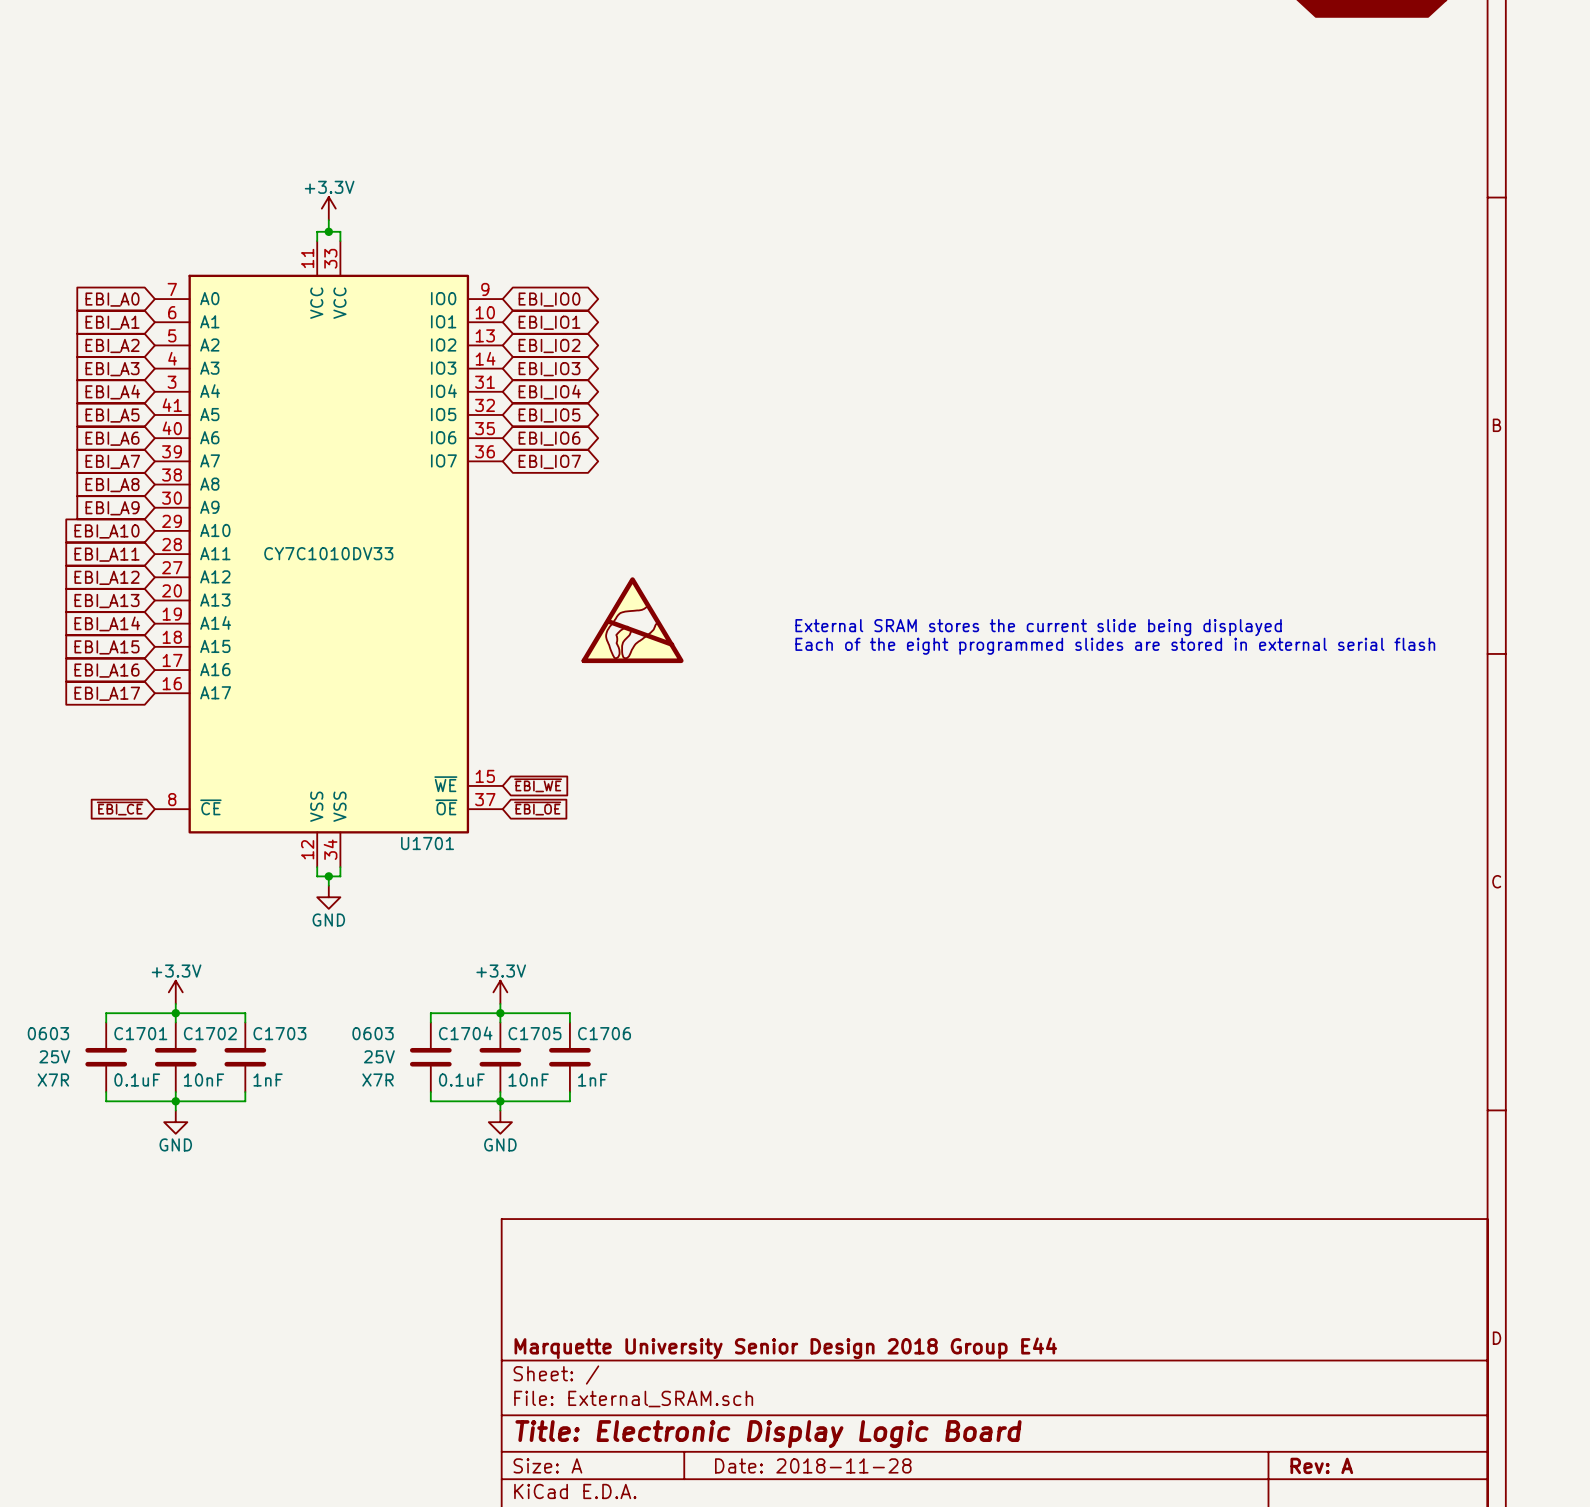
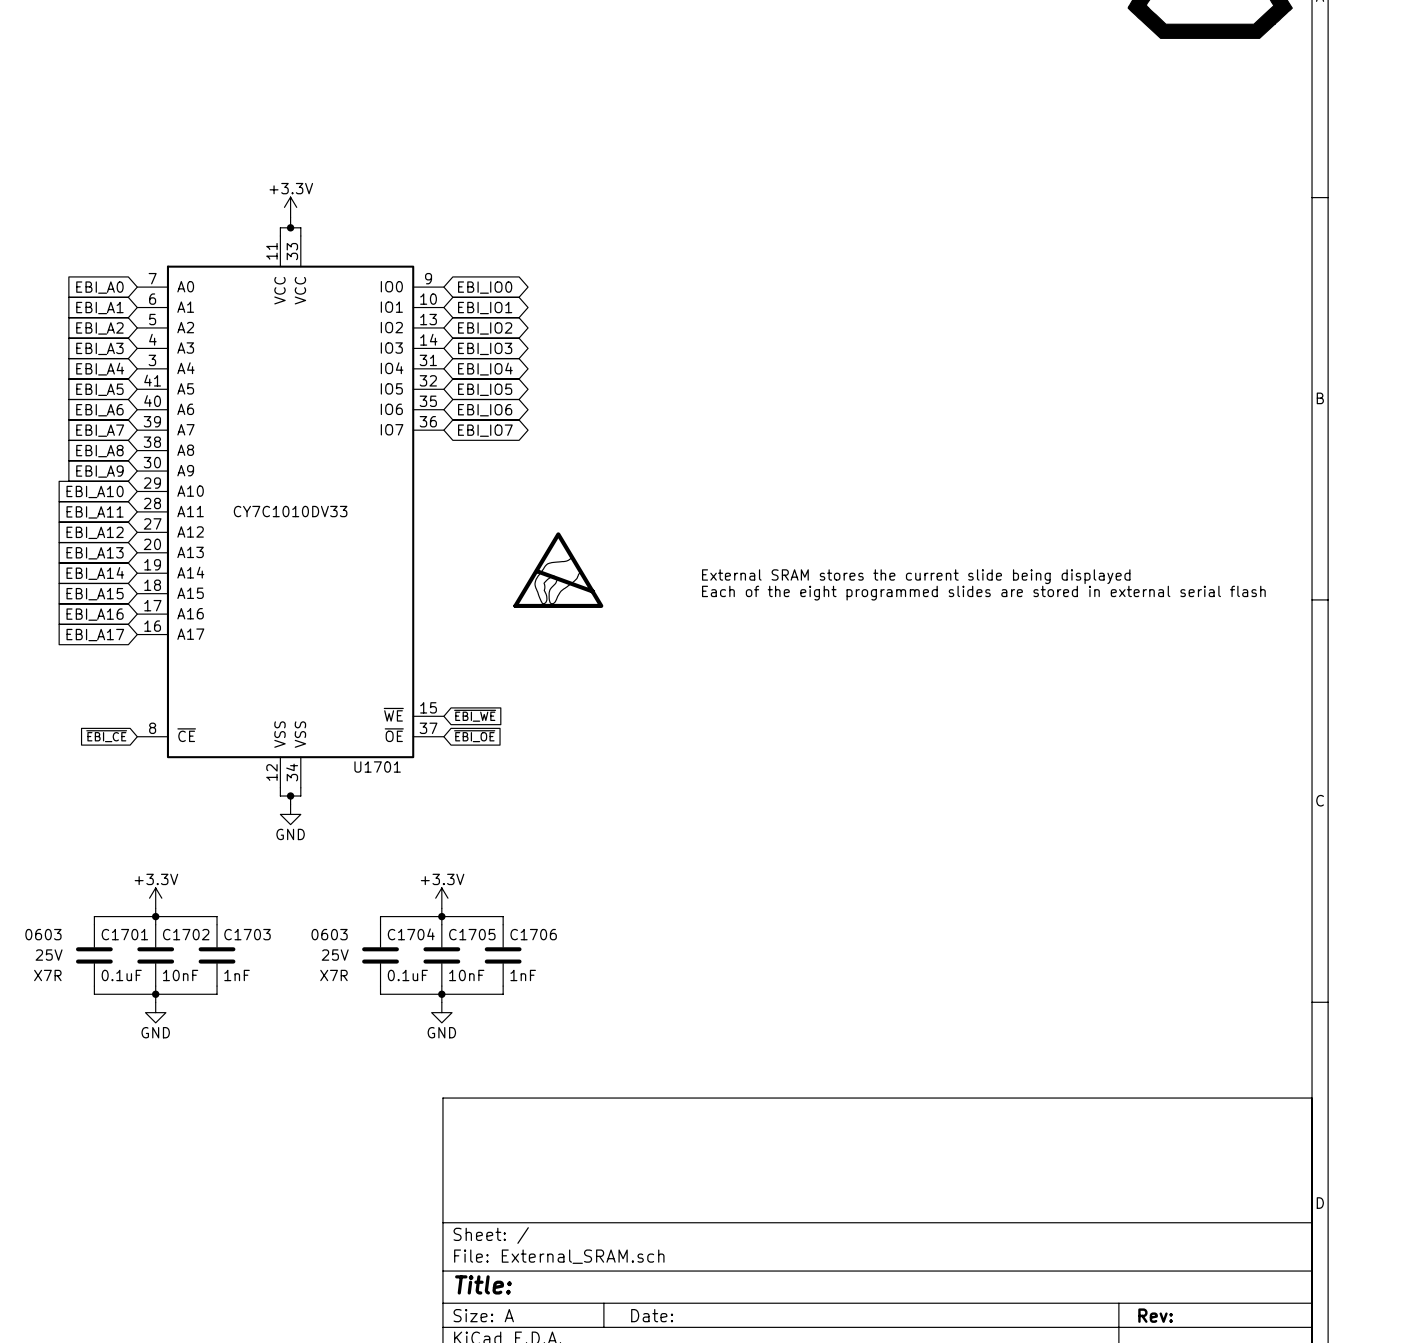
title block: Marquette University Senior Design 2018 Group E44 (785, 1348) -> none
title block: Title: Electronic Display Logic Board (768, 1434) -> Title: (483, 1284)
title block: Date: 2018-11-28 (813, 1465) -> Date: (652, 1315)
title block: Rev: A (1321, 1465) -> Rev: (1155, 1315)

